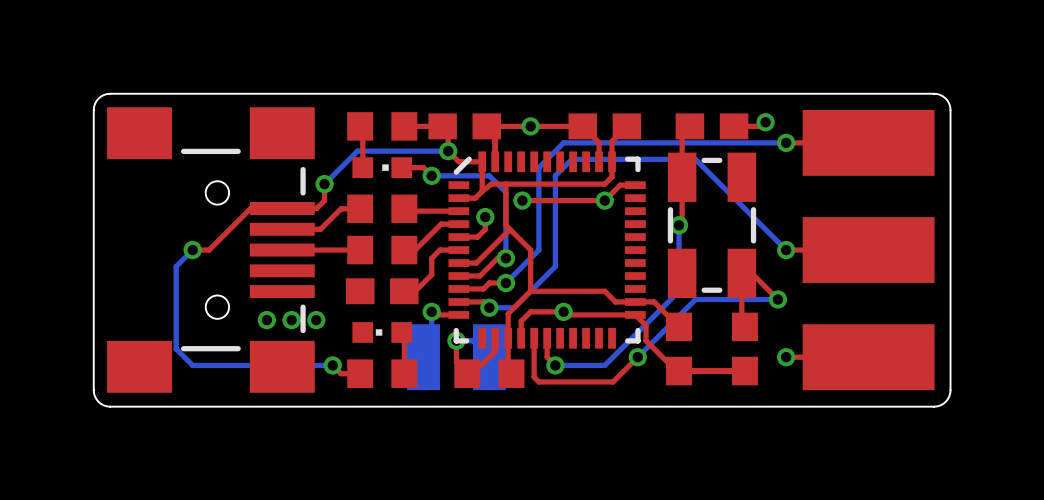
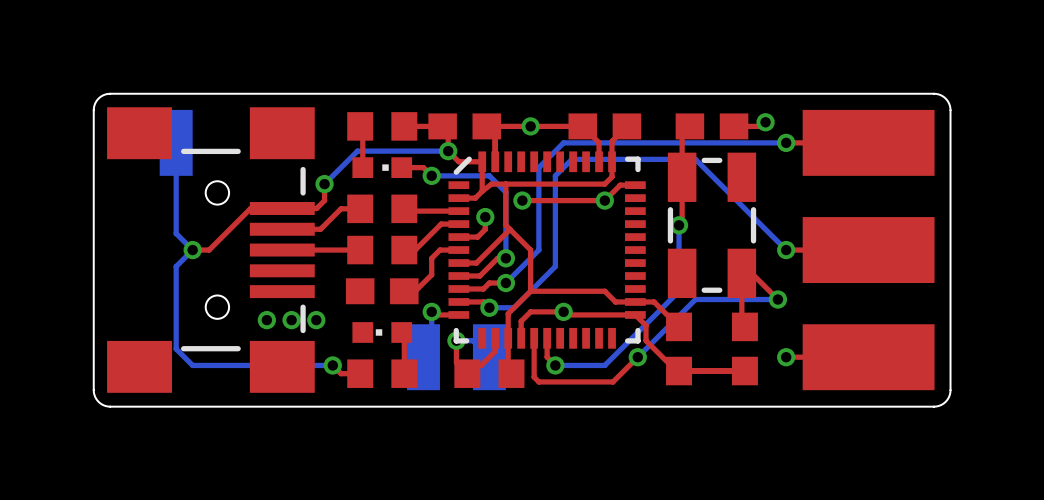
bottom track: none -> (176, 142) (176, 233) (192, 250)
part: none -> (176, 142)

